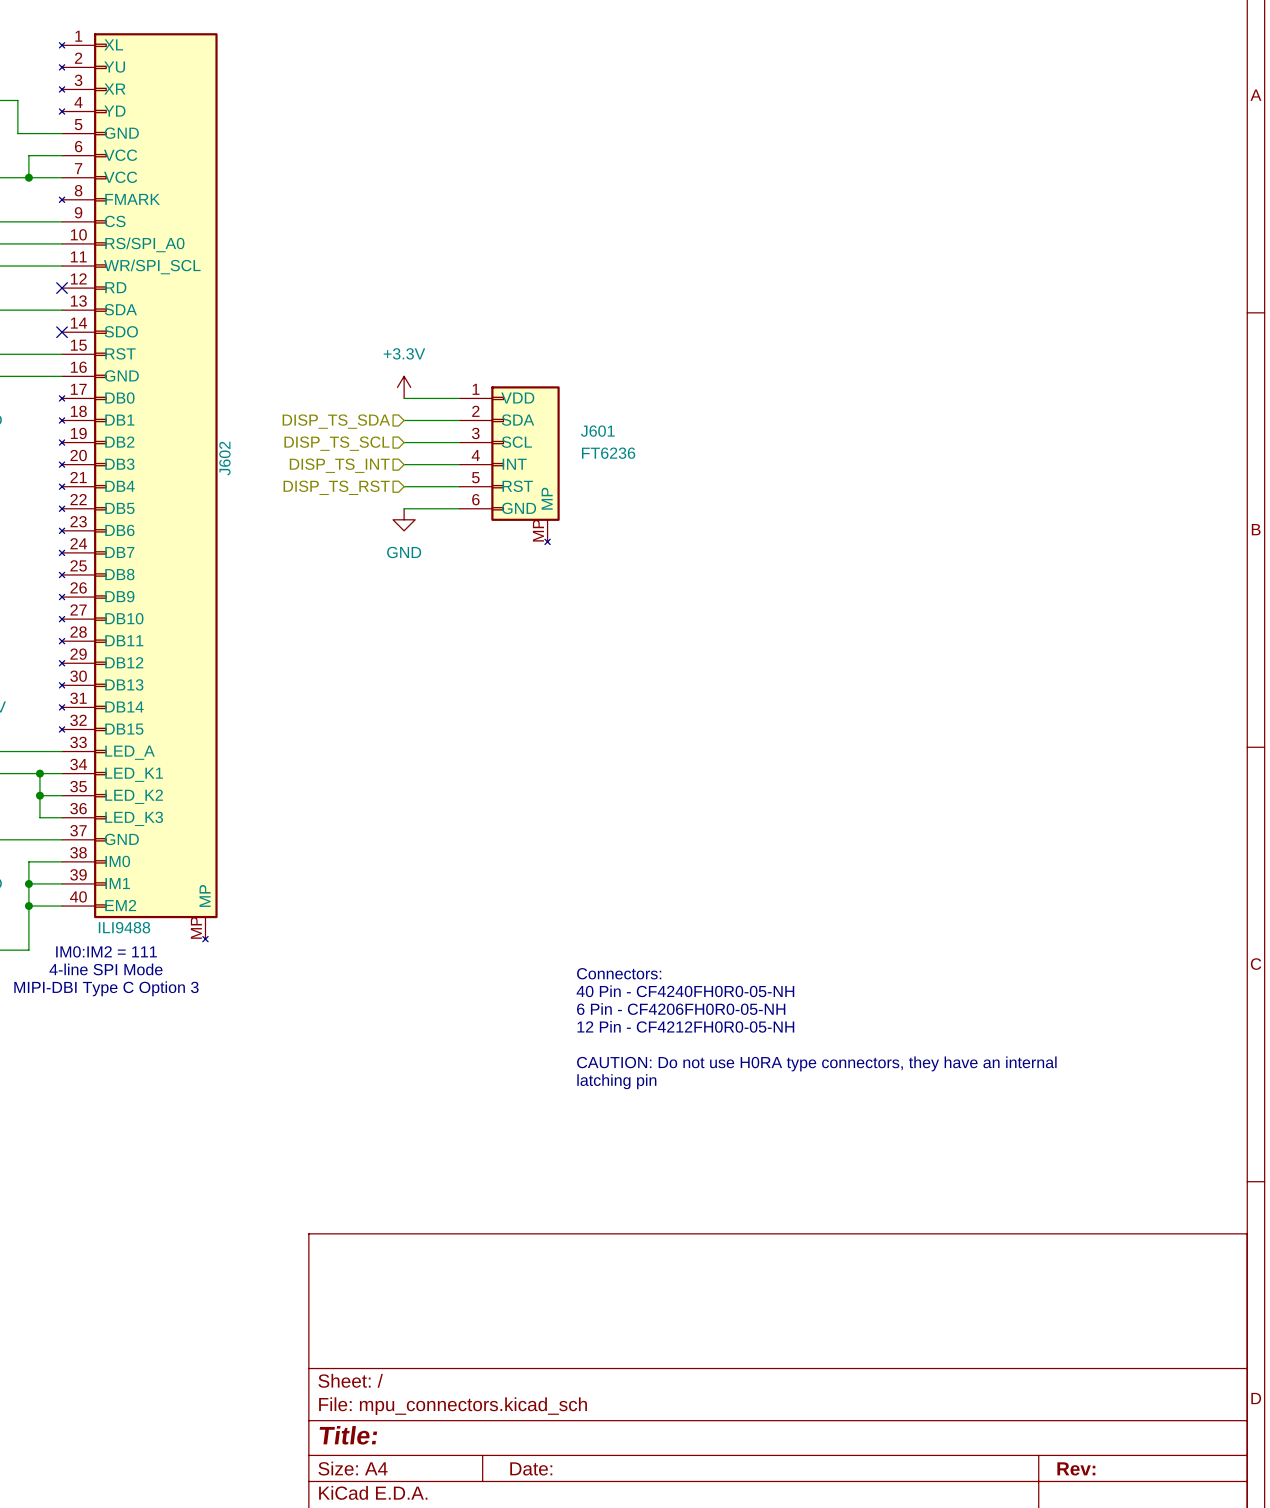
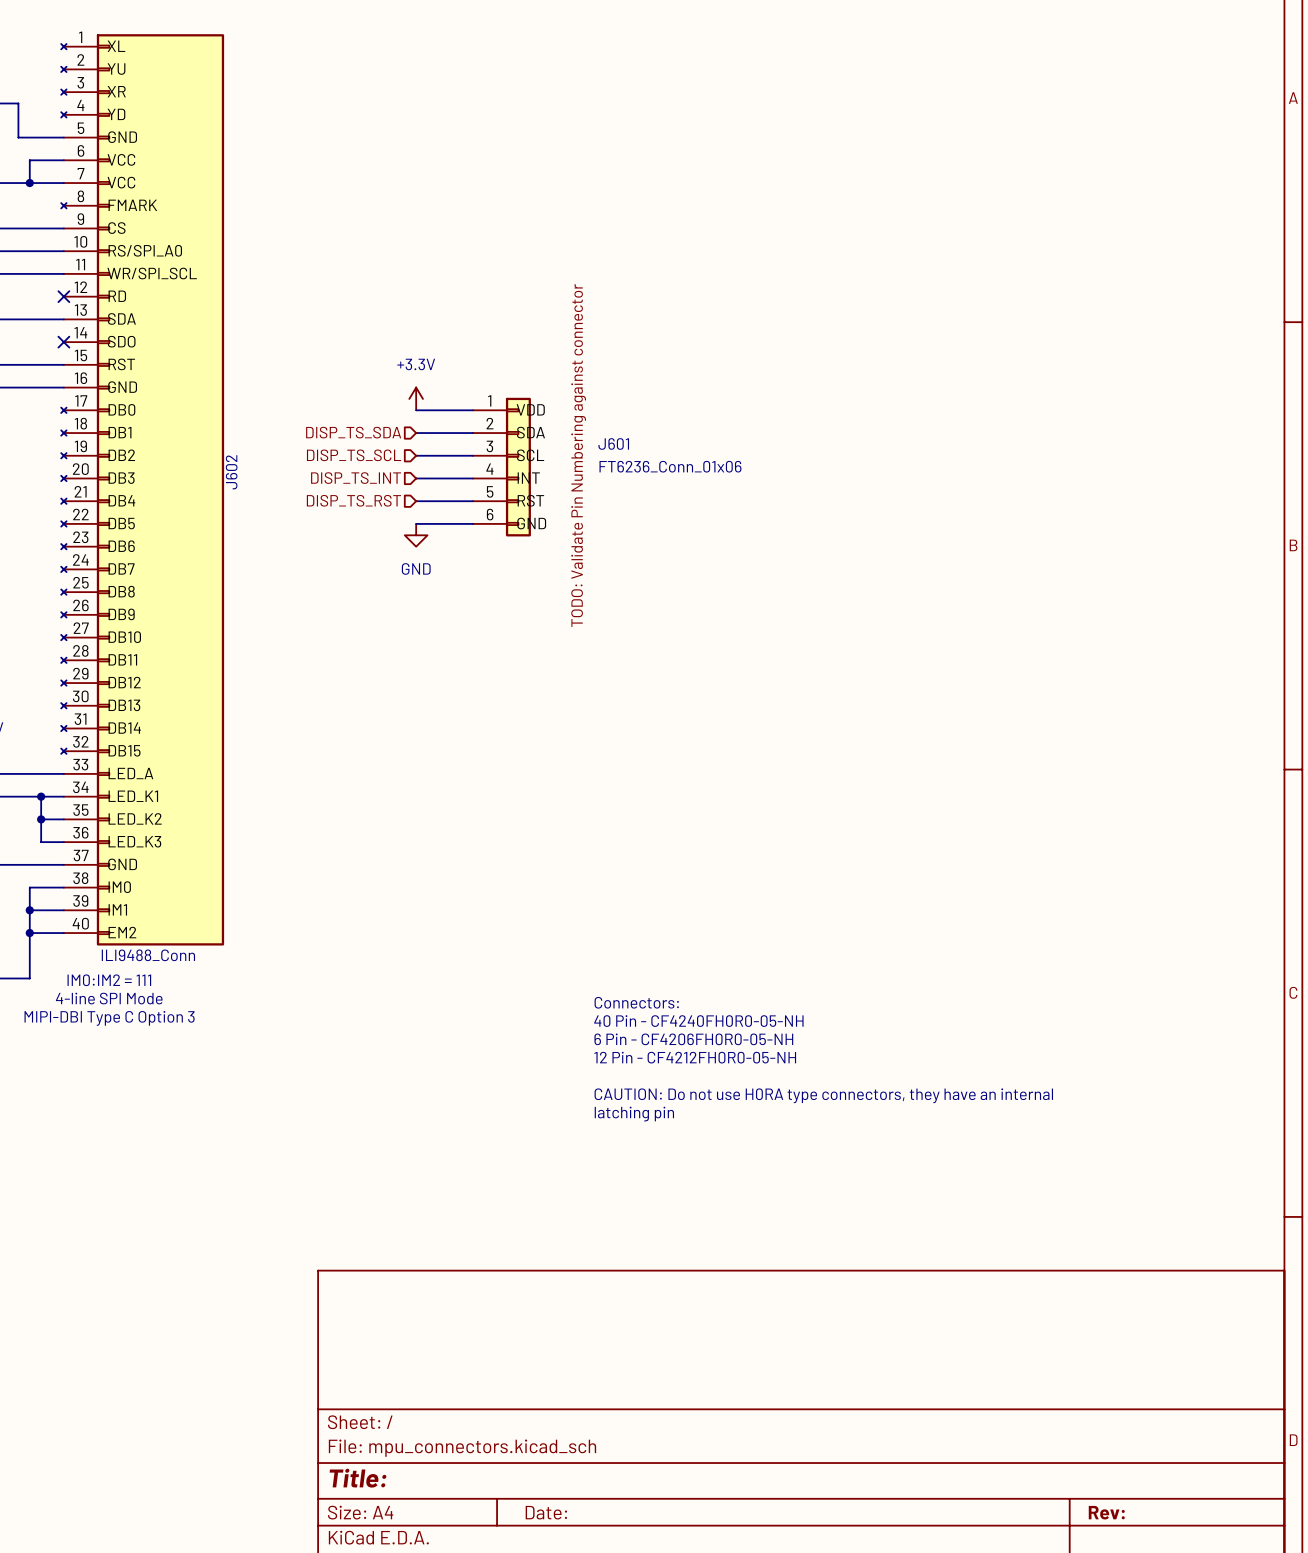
J602 symbol: [59, 33, 218, 942] -> [61, 34, 225, 946]
J601 symbol: [459, 386, 560, 545] -> [472, 397, 531, 537]
J601 value: FT6236 (608, 453) -> FT6236_Conn_01x06 (670, 466)
J602 value: ILI9488 (124, 927) -> ILI9488_Conn (148, 955)

